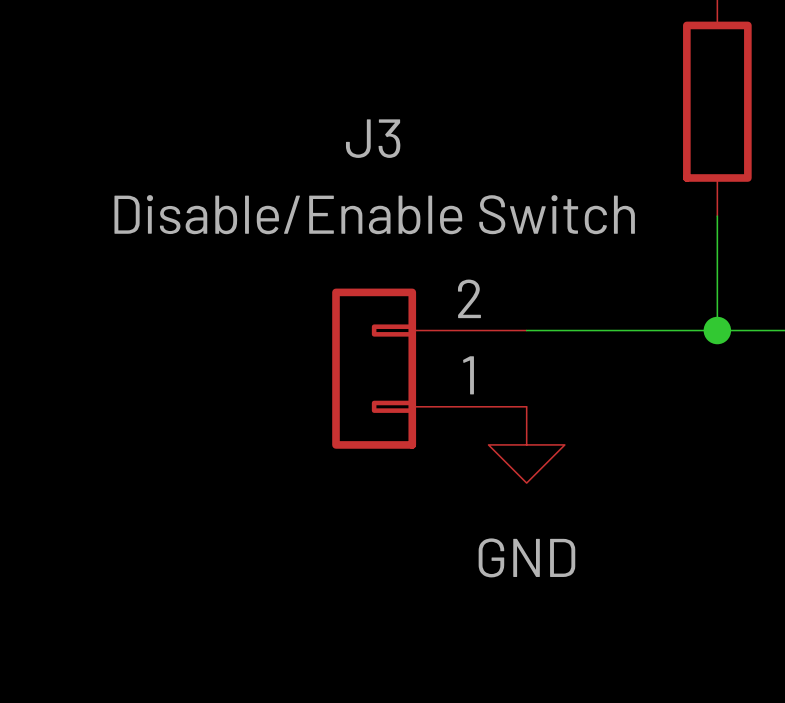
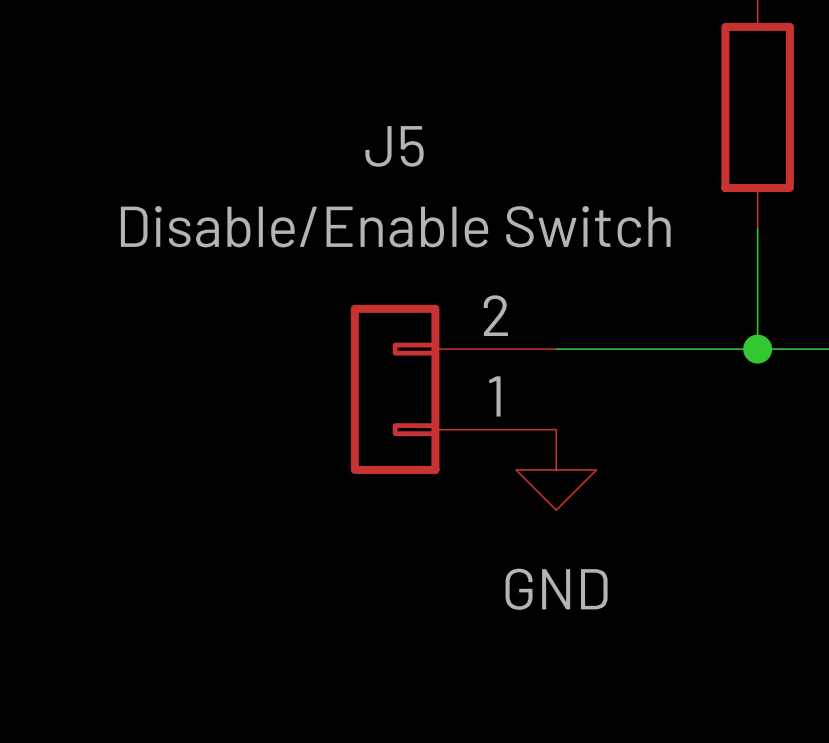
J3 name: J3 (373, 138) -> J5 (394, 146)

